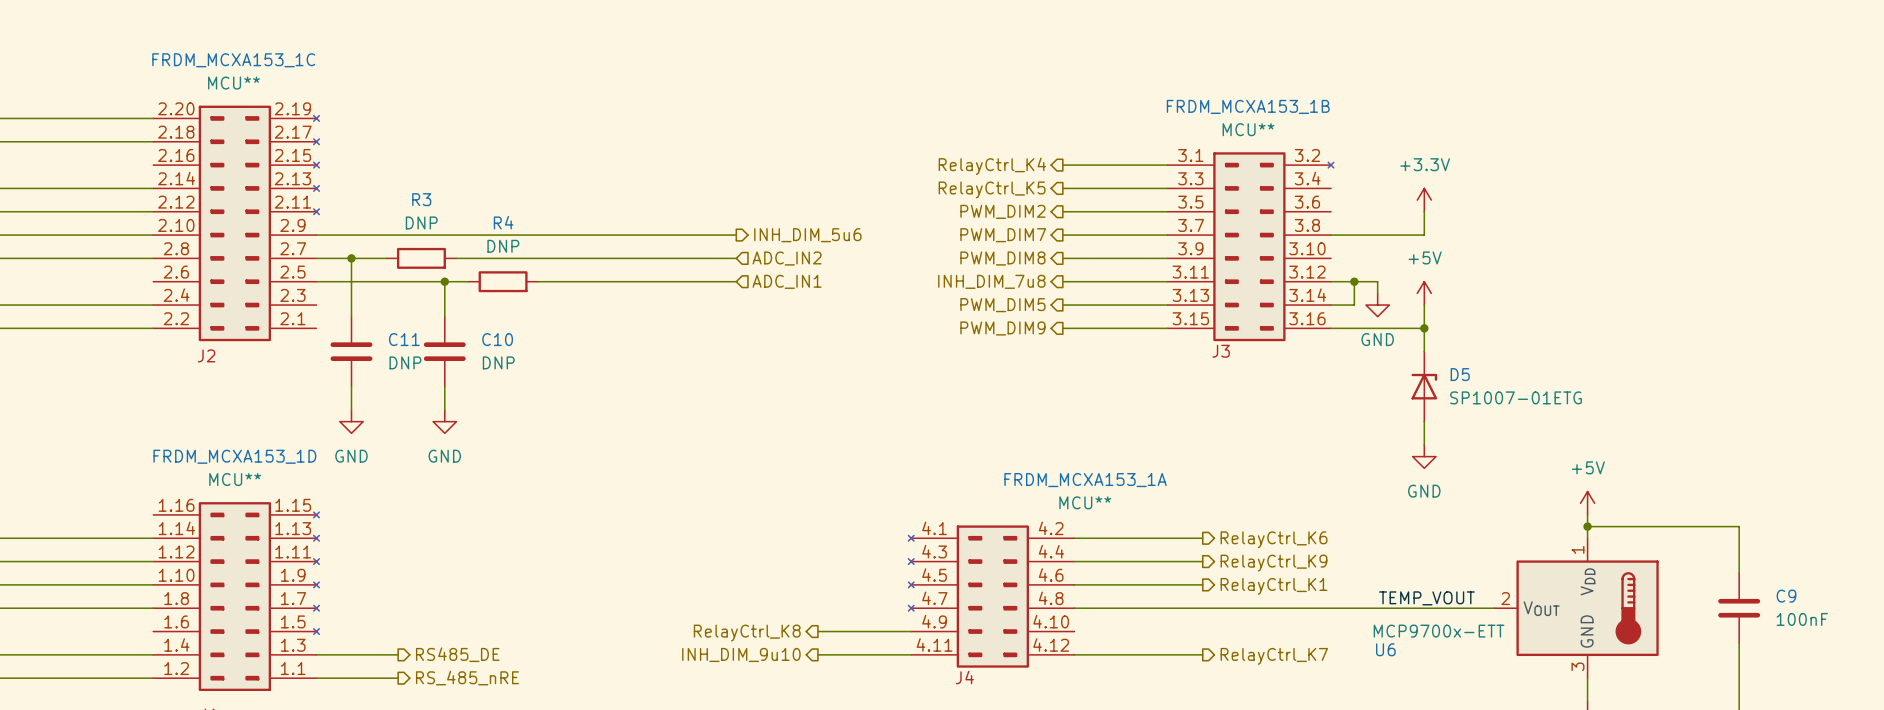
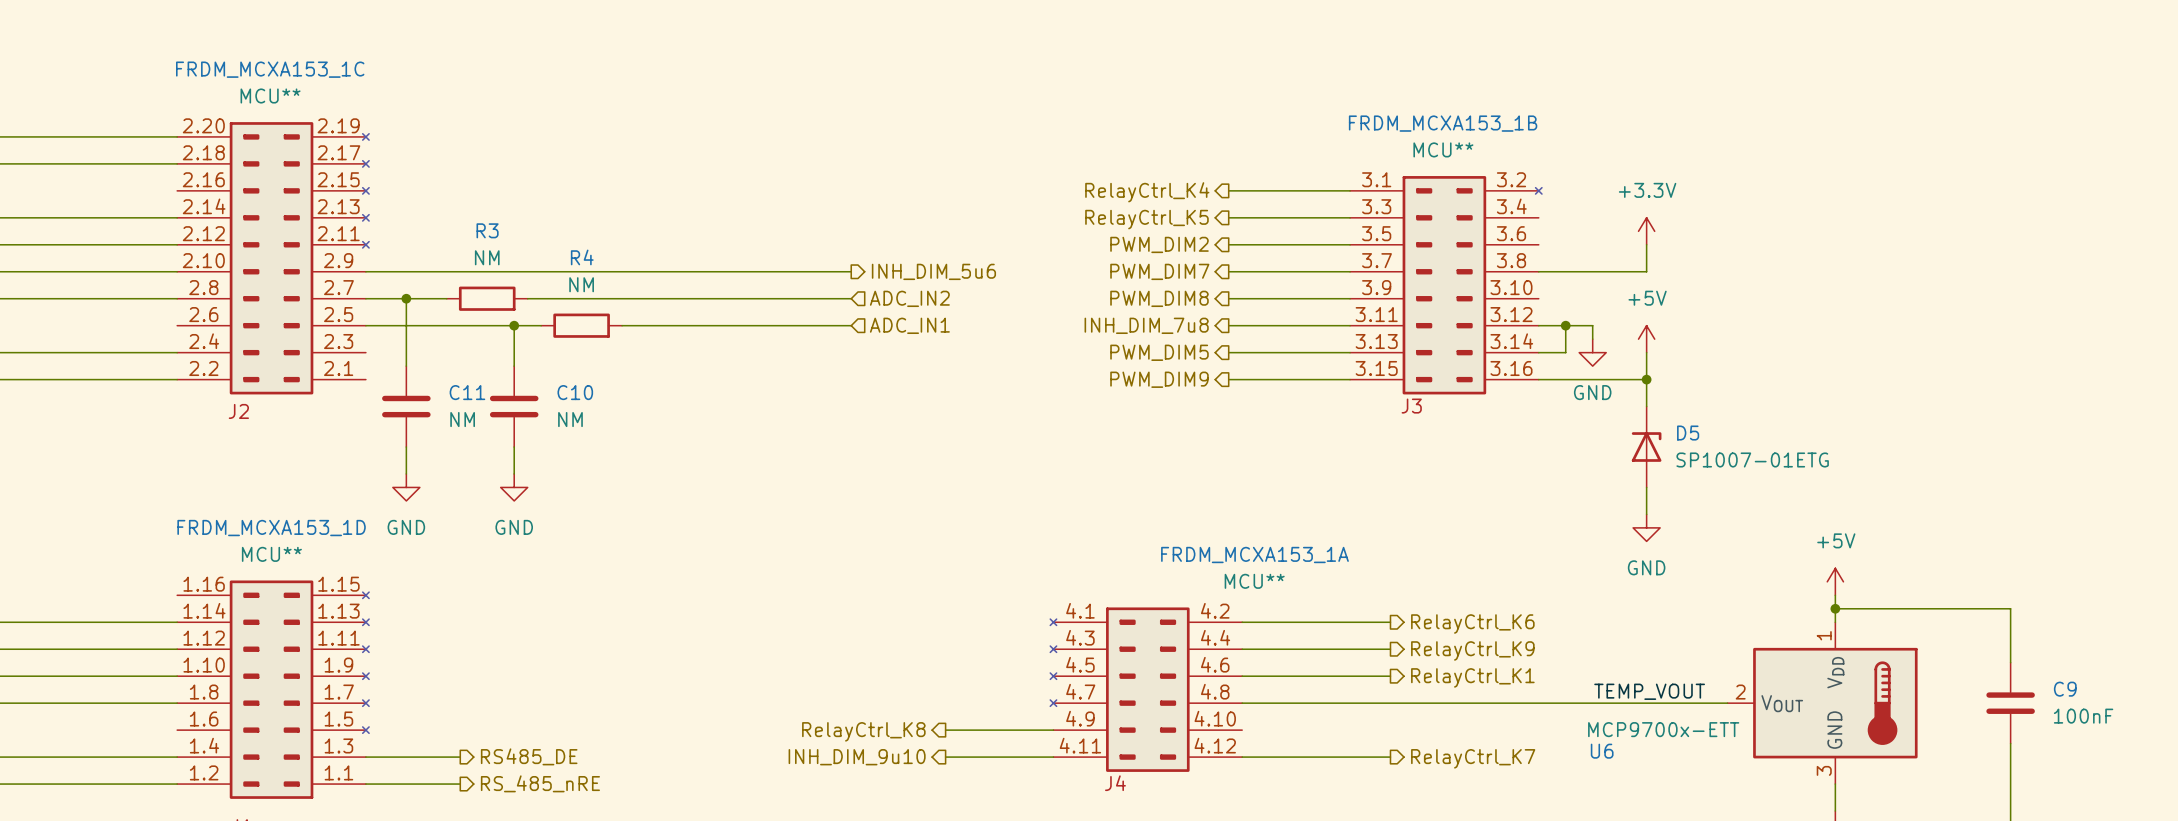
R3 value: DNP (421, 222) -> NM (487, 257)
R4 value: DNP (503, 246) -> NM (581, 284)
C11 value: DNP (405, 362) -> NM (462, 419)
C10 value: DNP (498, 362) -> NM (570, 419)

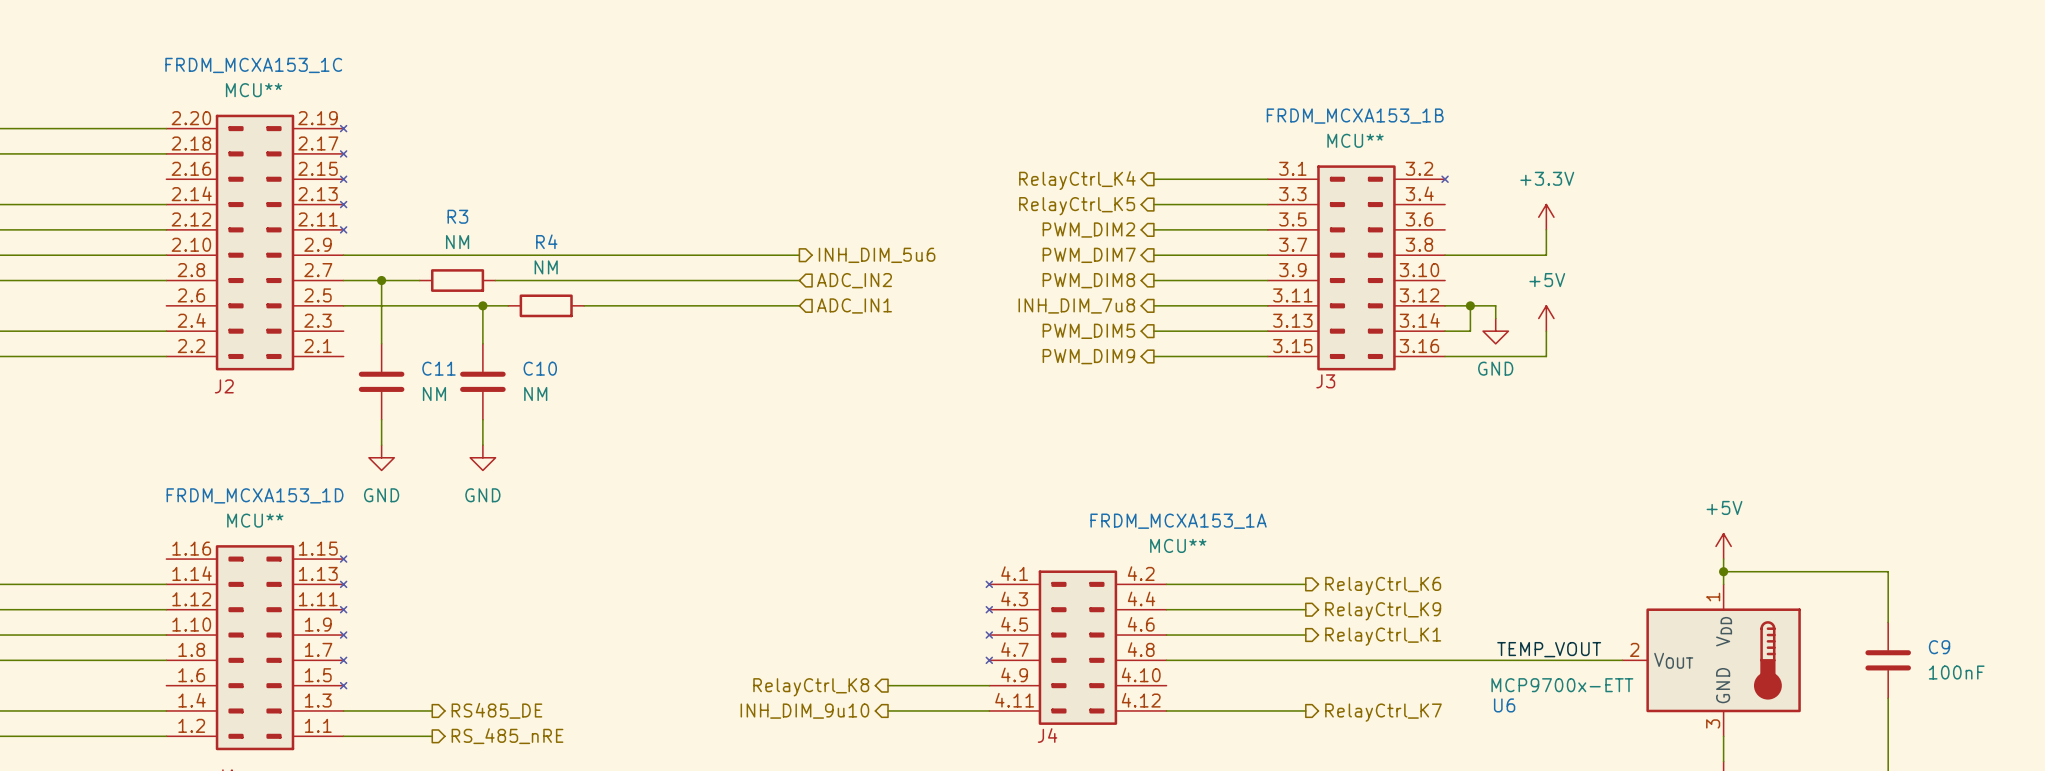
wire: (1646, 379) (1646, 406) -> none
junction: (1646, 379) -> none
D5: SP1007-01ETG (1646, 447) -> none
wire: (1646, 487) (1646, 514) -> none
power symbol: GND (1646, 527) -> none

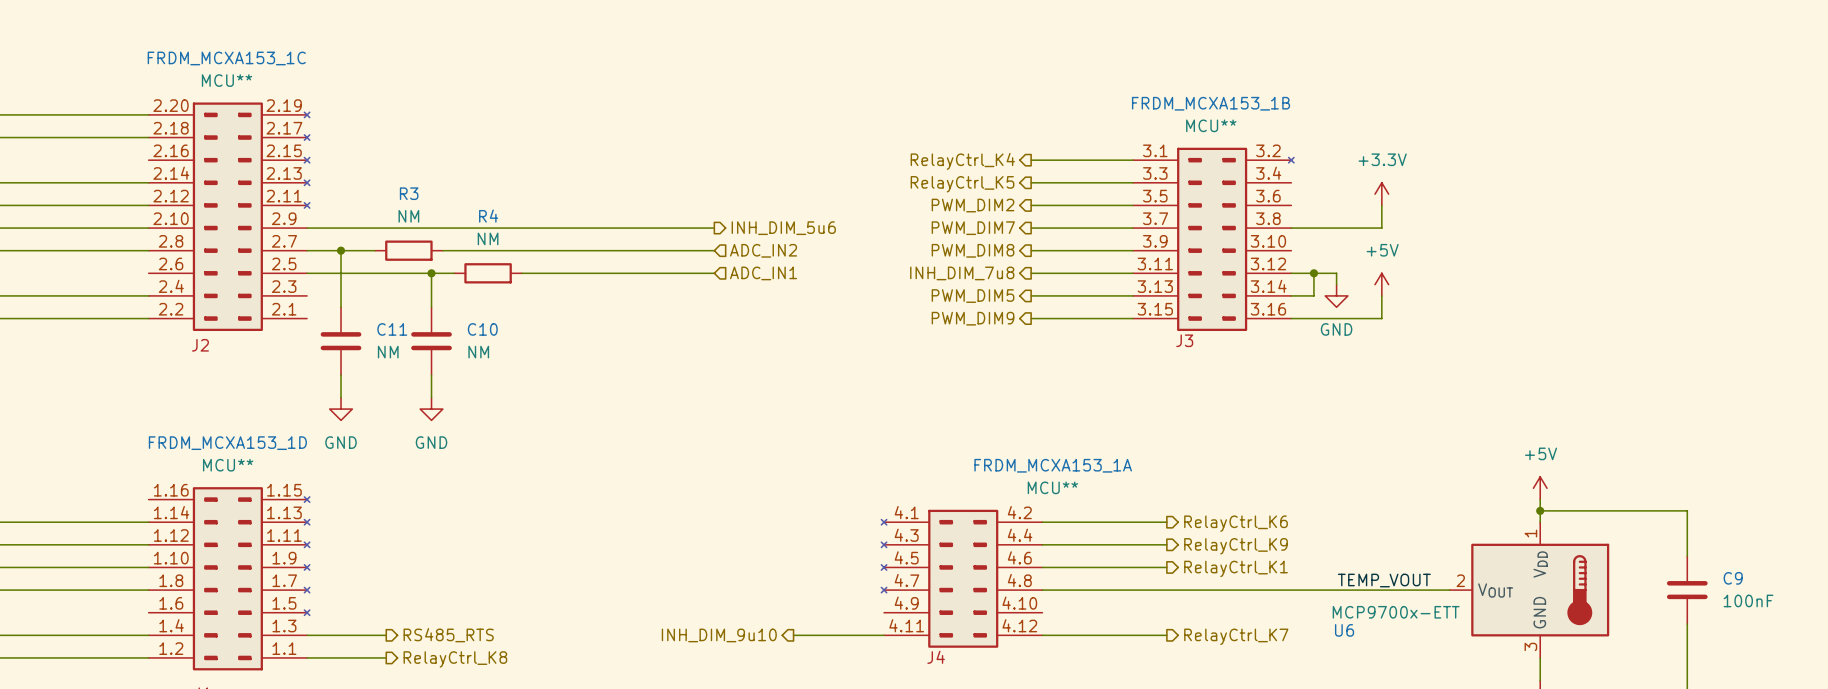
wire: (888, 685) (989, 685) -> none
hierarchical label: RelayCtrl_K8 (811, 687) -> none
hierarchical label: RS485_DE (496, 710) -> RS485_RTS (448, 635)
hierarchical label: RS_485_nRE (507, 736) -> RelayCtrl_K8 (455, 659)

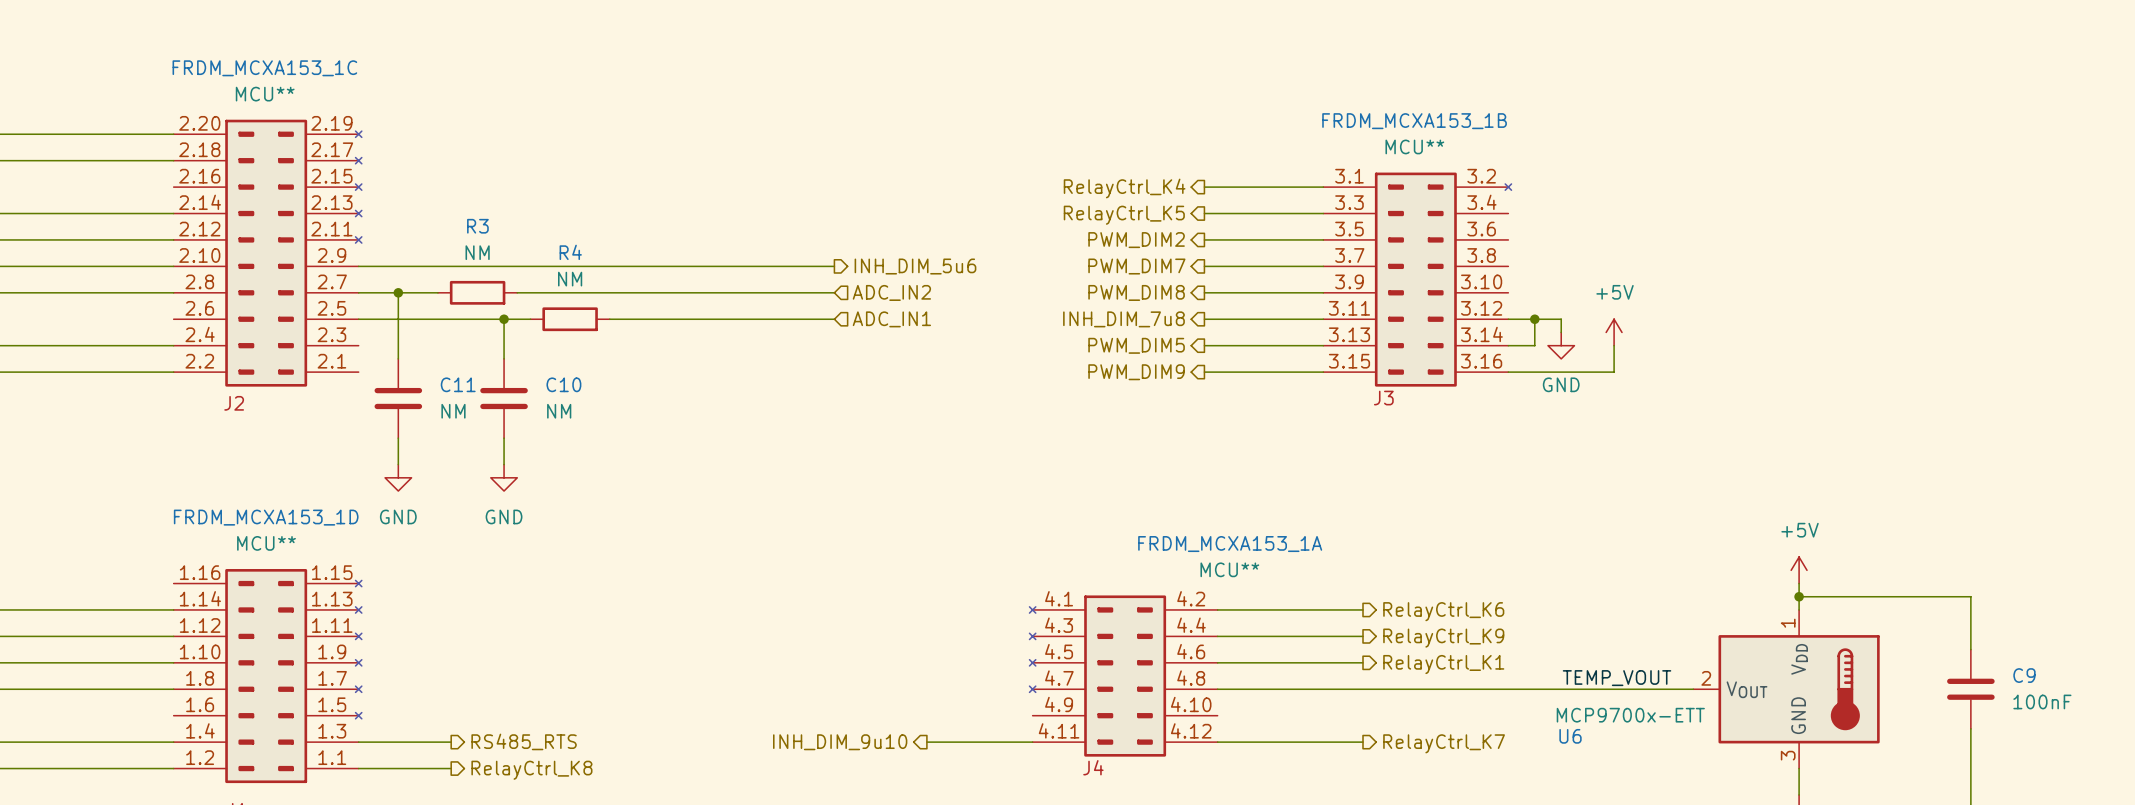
power symbol: +3.3V (1381, 194) -> none
wire: (1381, 205) (1381, 228) (1291, 228) -> none

